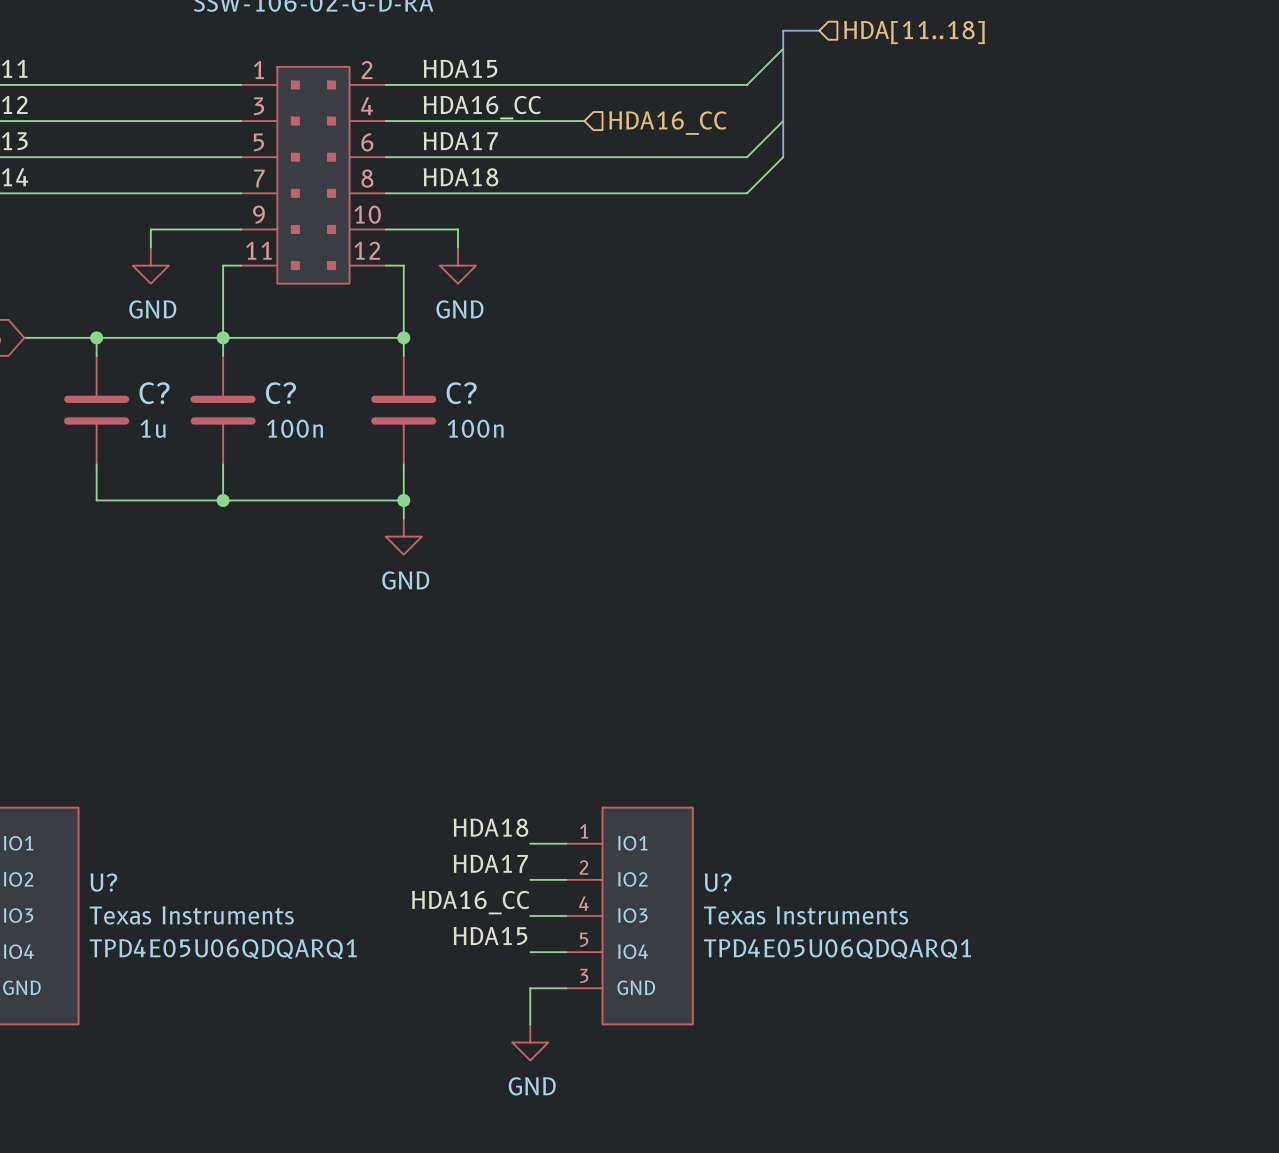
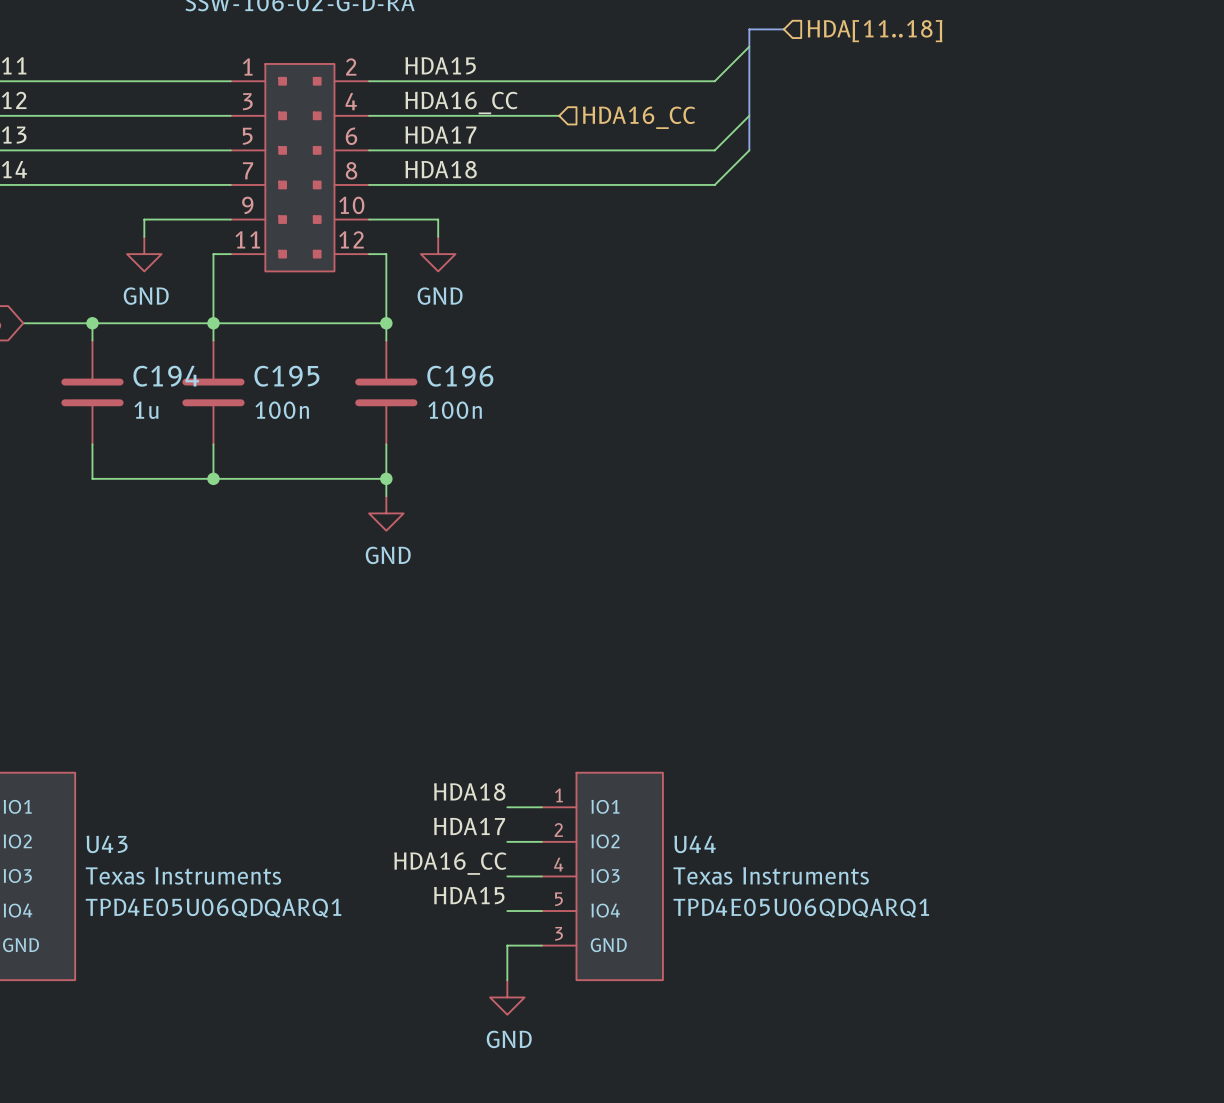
C? name: C? (154, 393) -> C194 (166, 376)
C? name: C? (280, 393) -> C195 (286, 376)
C? name: C? (461, 393) -> C196 (460, 376)
U? name: U? (103, 882) -> U43 (107, 844)
U? name: U? (718, 882) -> U44 (695, 844)

